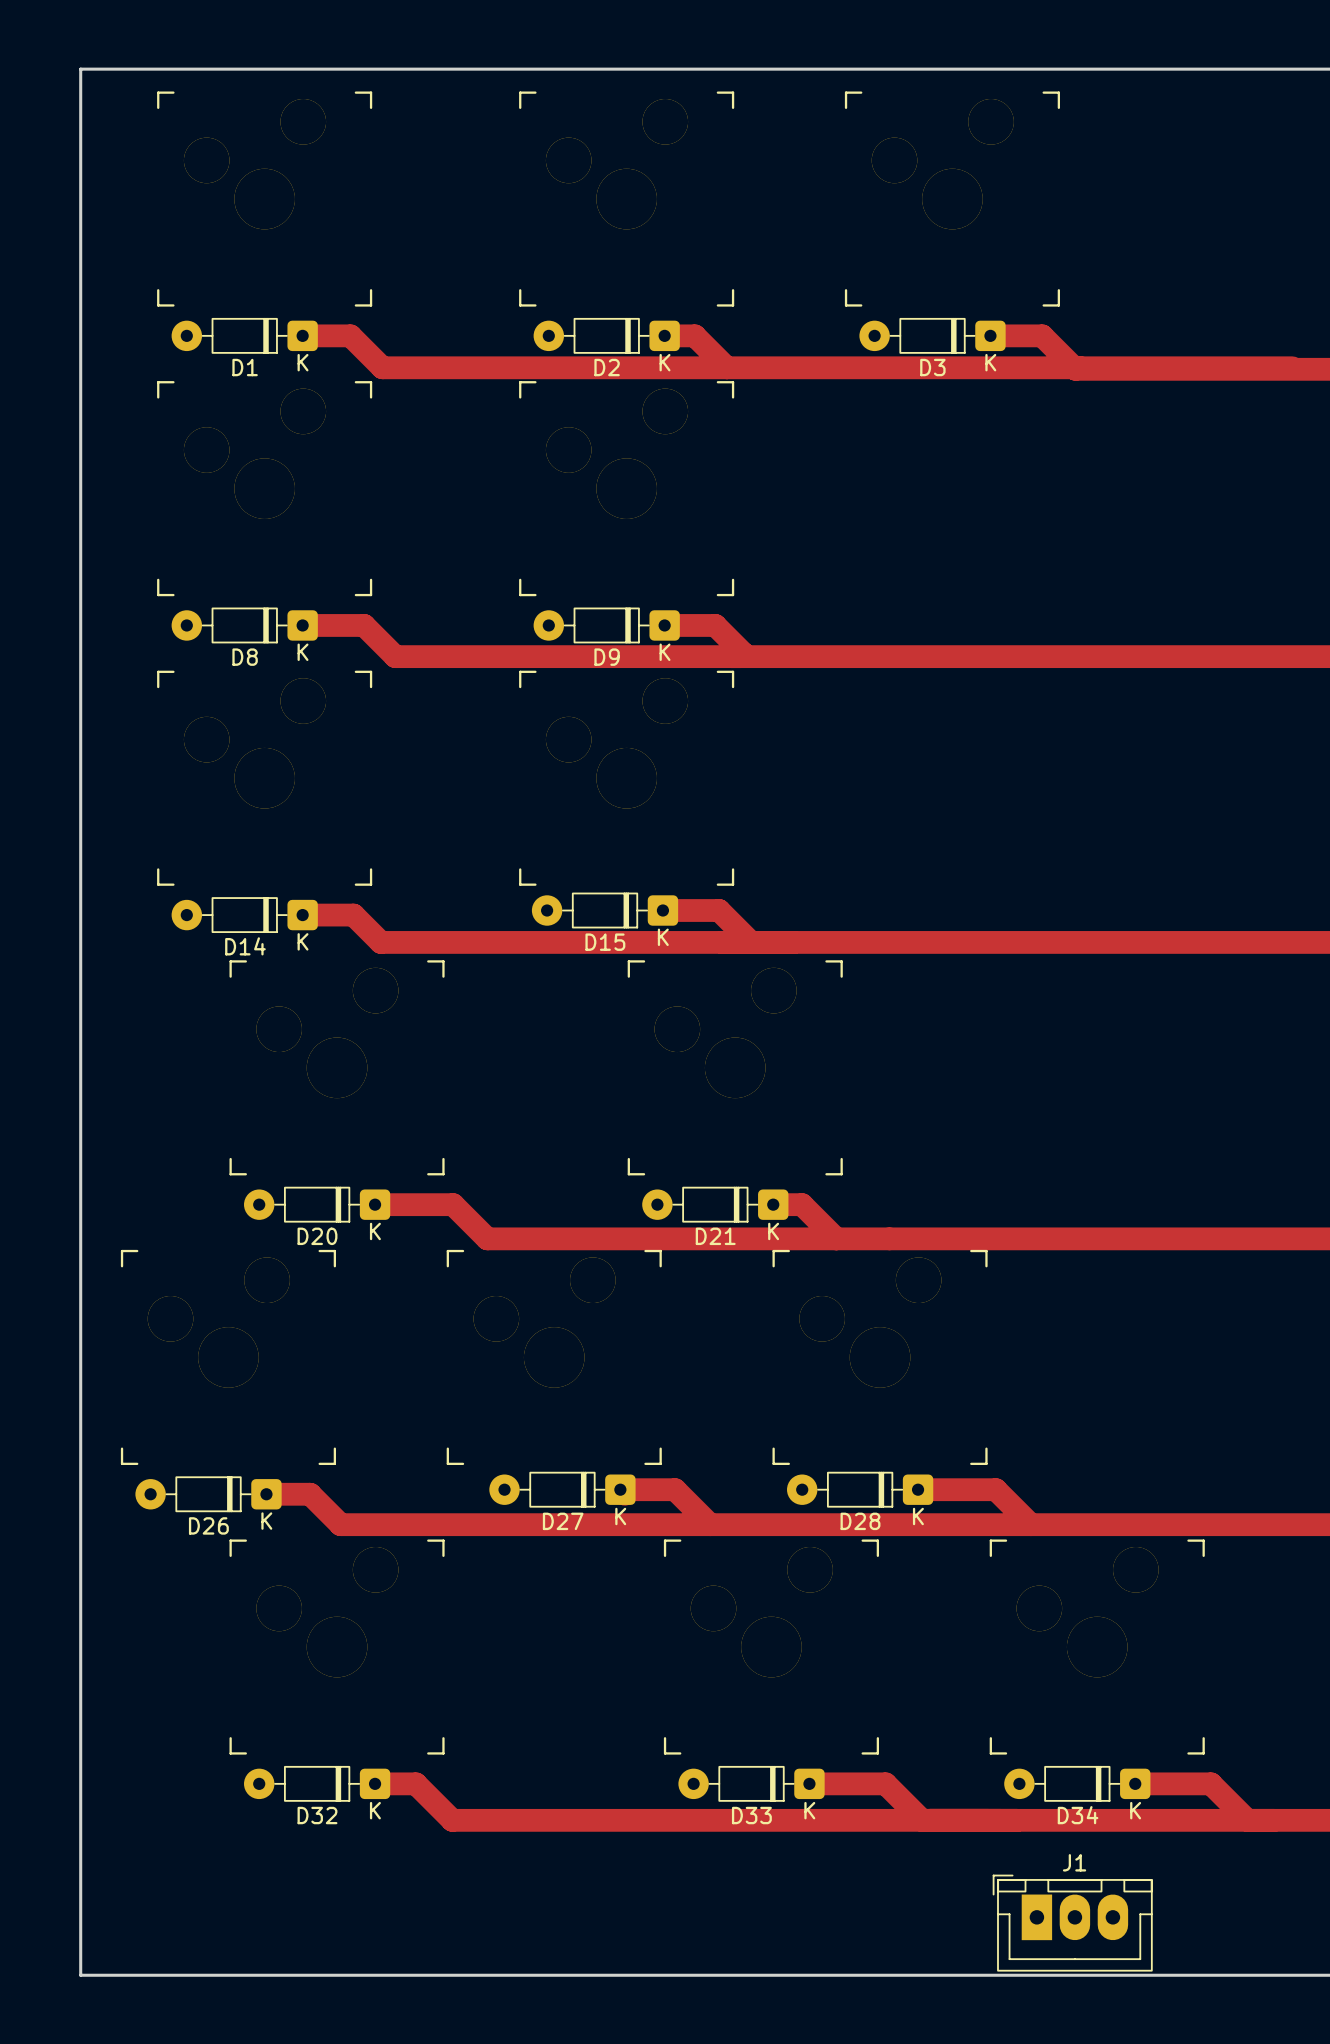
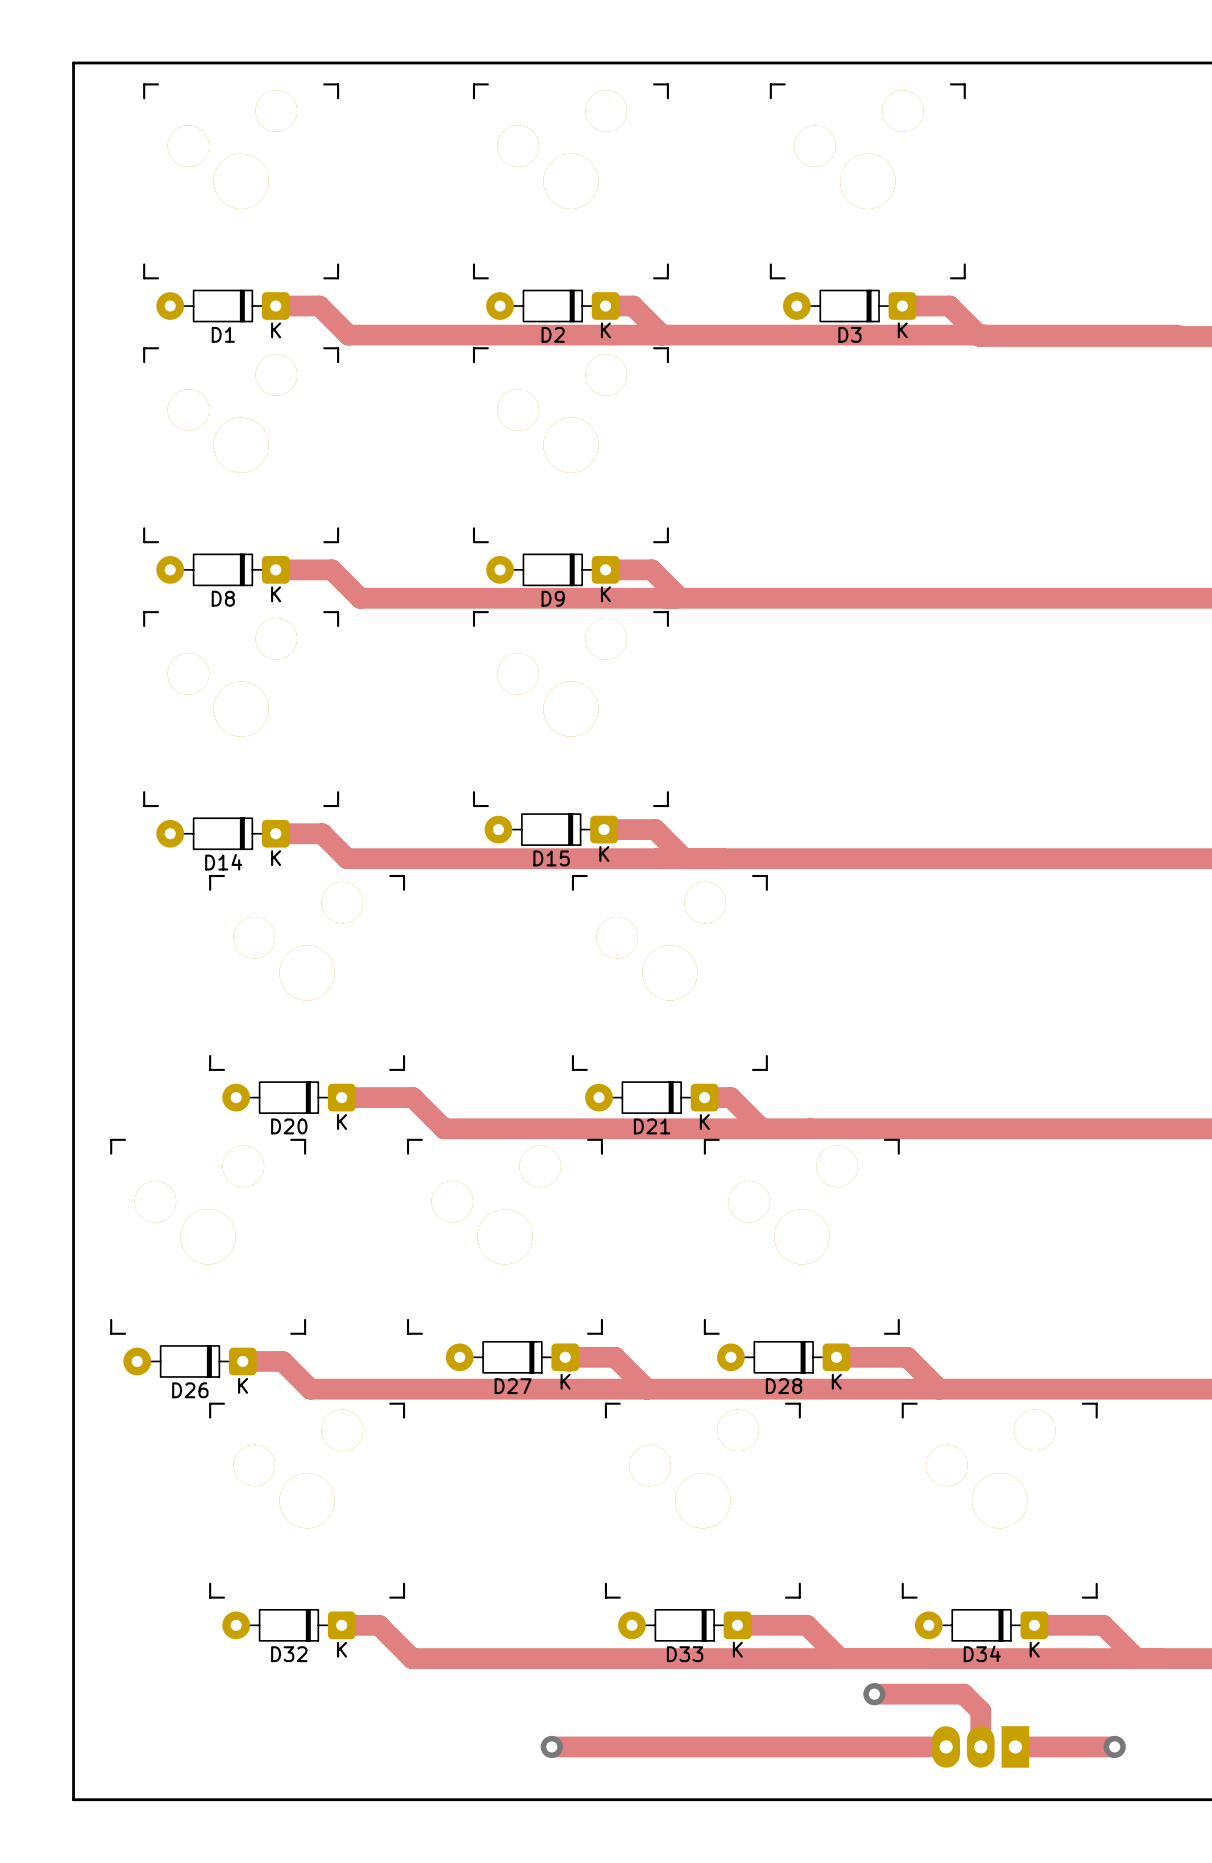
track: none -> (874, 1694) (963, 1694) (980, 1711) (979, 1746)
via: none -> (874, 1694)
track: none -> (551, 1746) (944, 1746)
via: none -> (551, 1746)
track: none -> (1015, 1746) (1114, 1746)
via: none -> (1114, 1746)
J1 side: top (1072, 1923) -> bottom (980, 1746)

